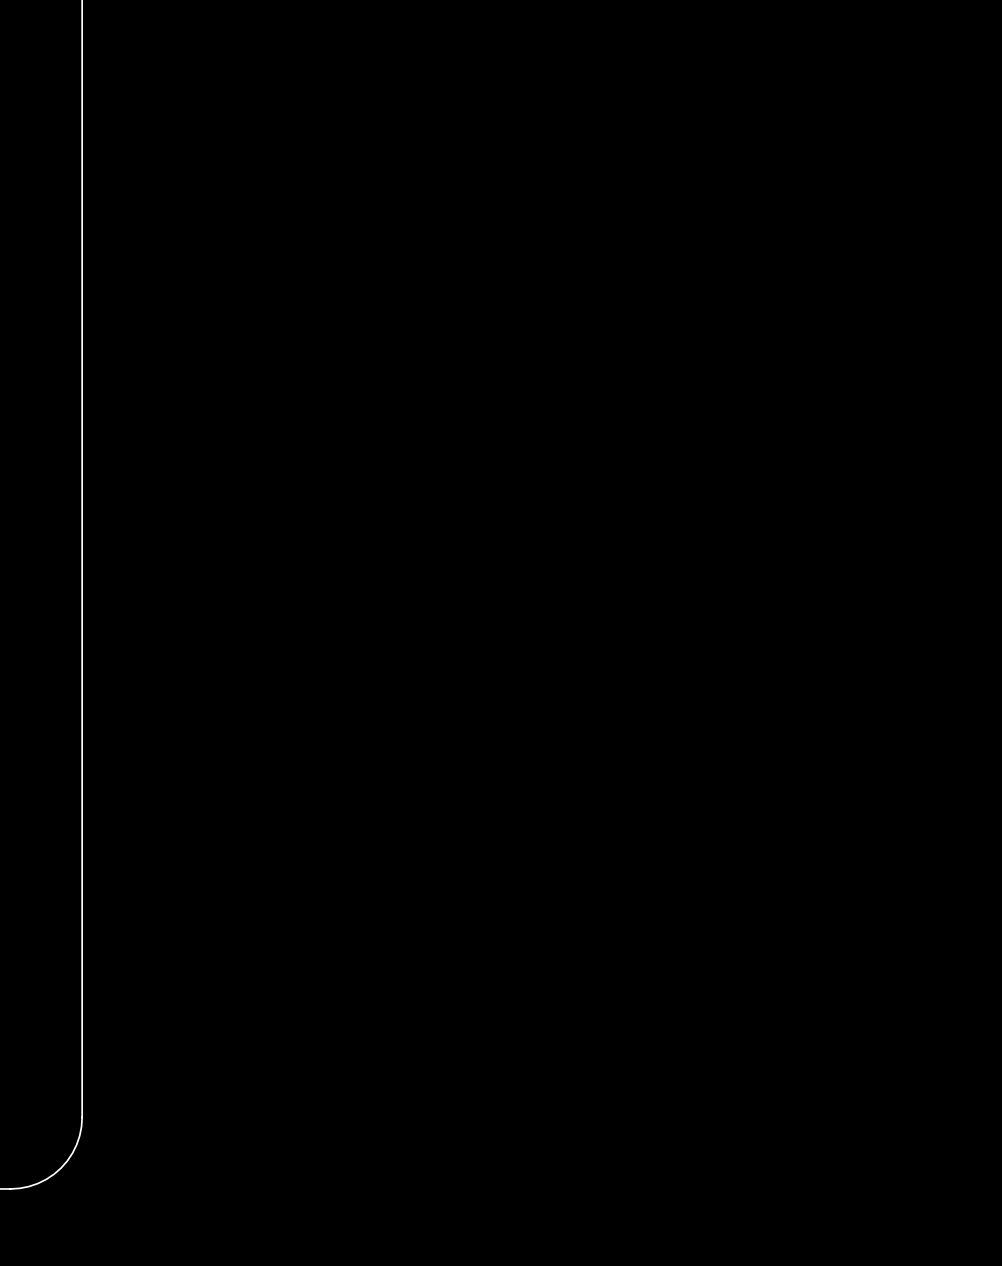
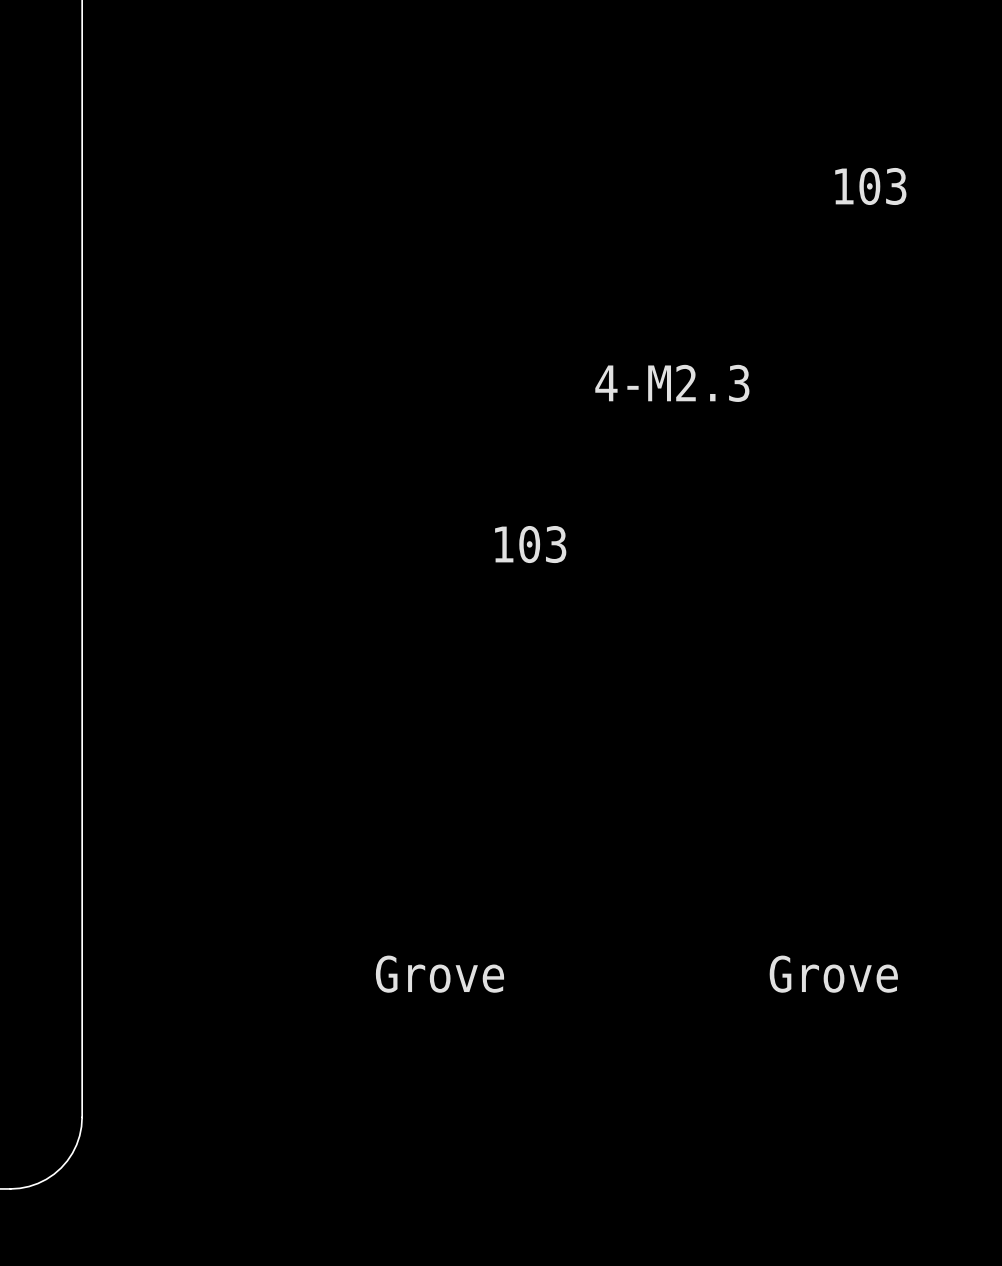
text: none -> 103 (870, 186)
text: none -> 4-M2.3 (672, 383)
text: none -> 103 (530, 544)
text: none -> Grove (439, 974)
text: none -> Grove (833, 974)

